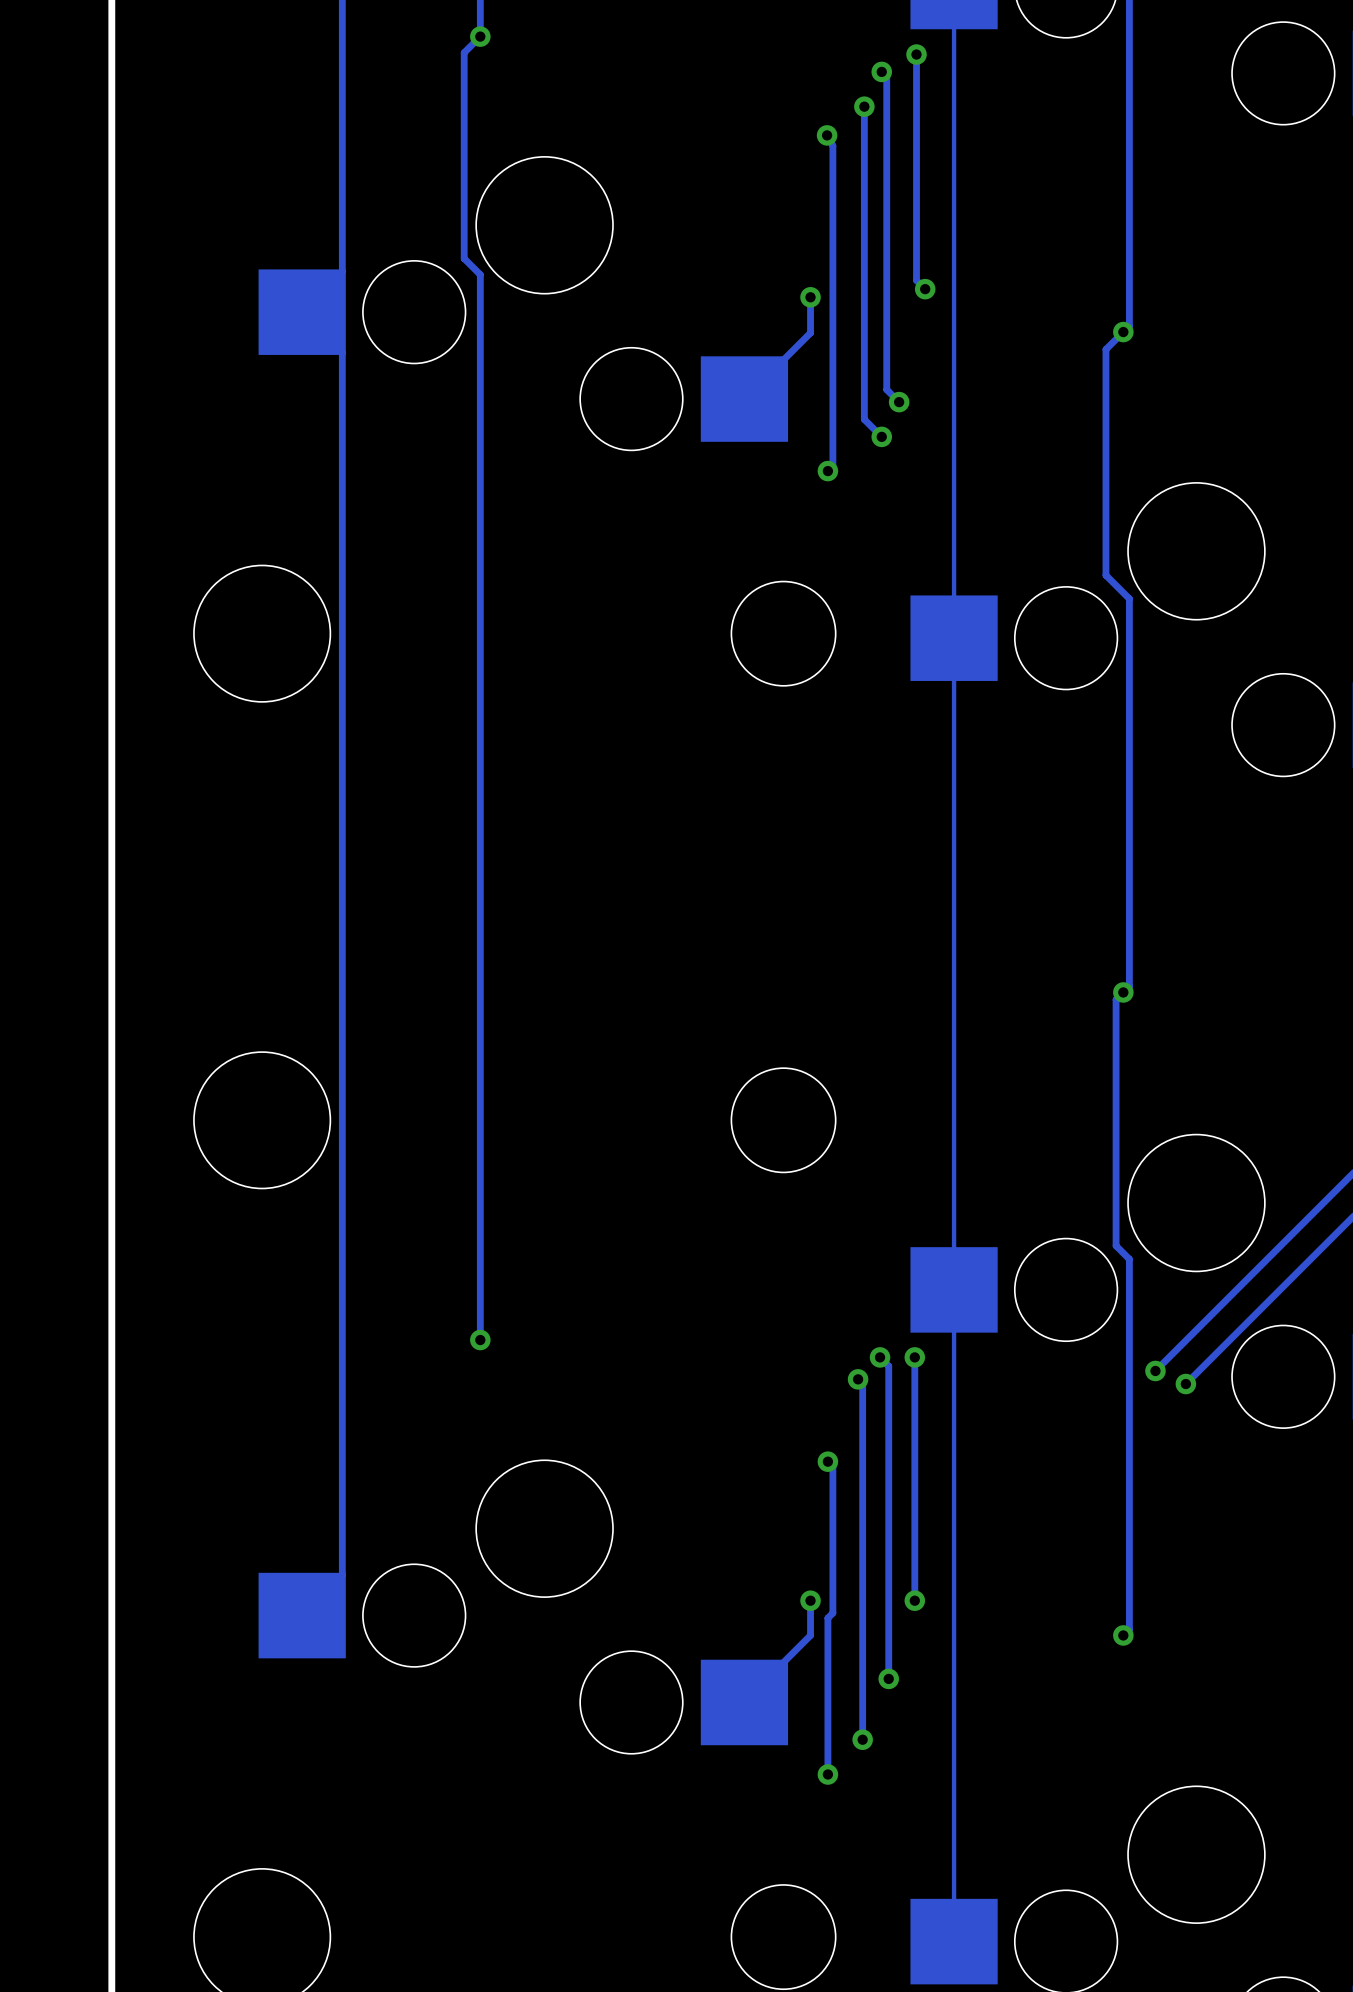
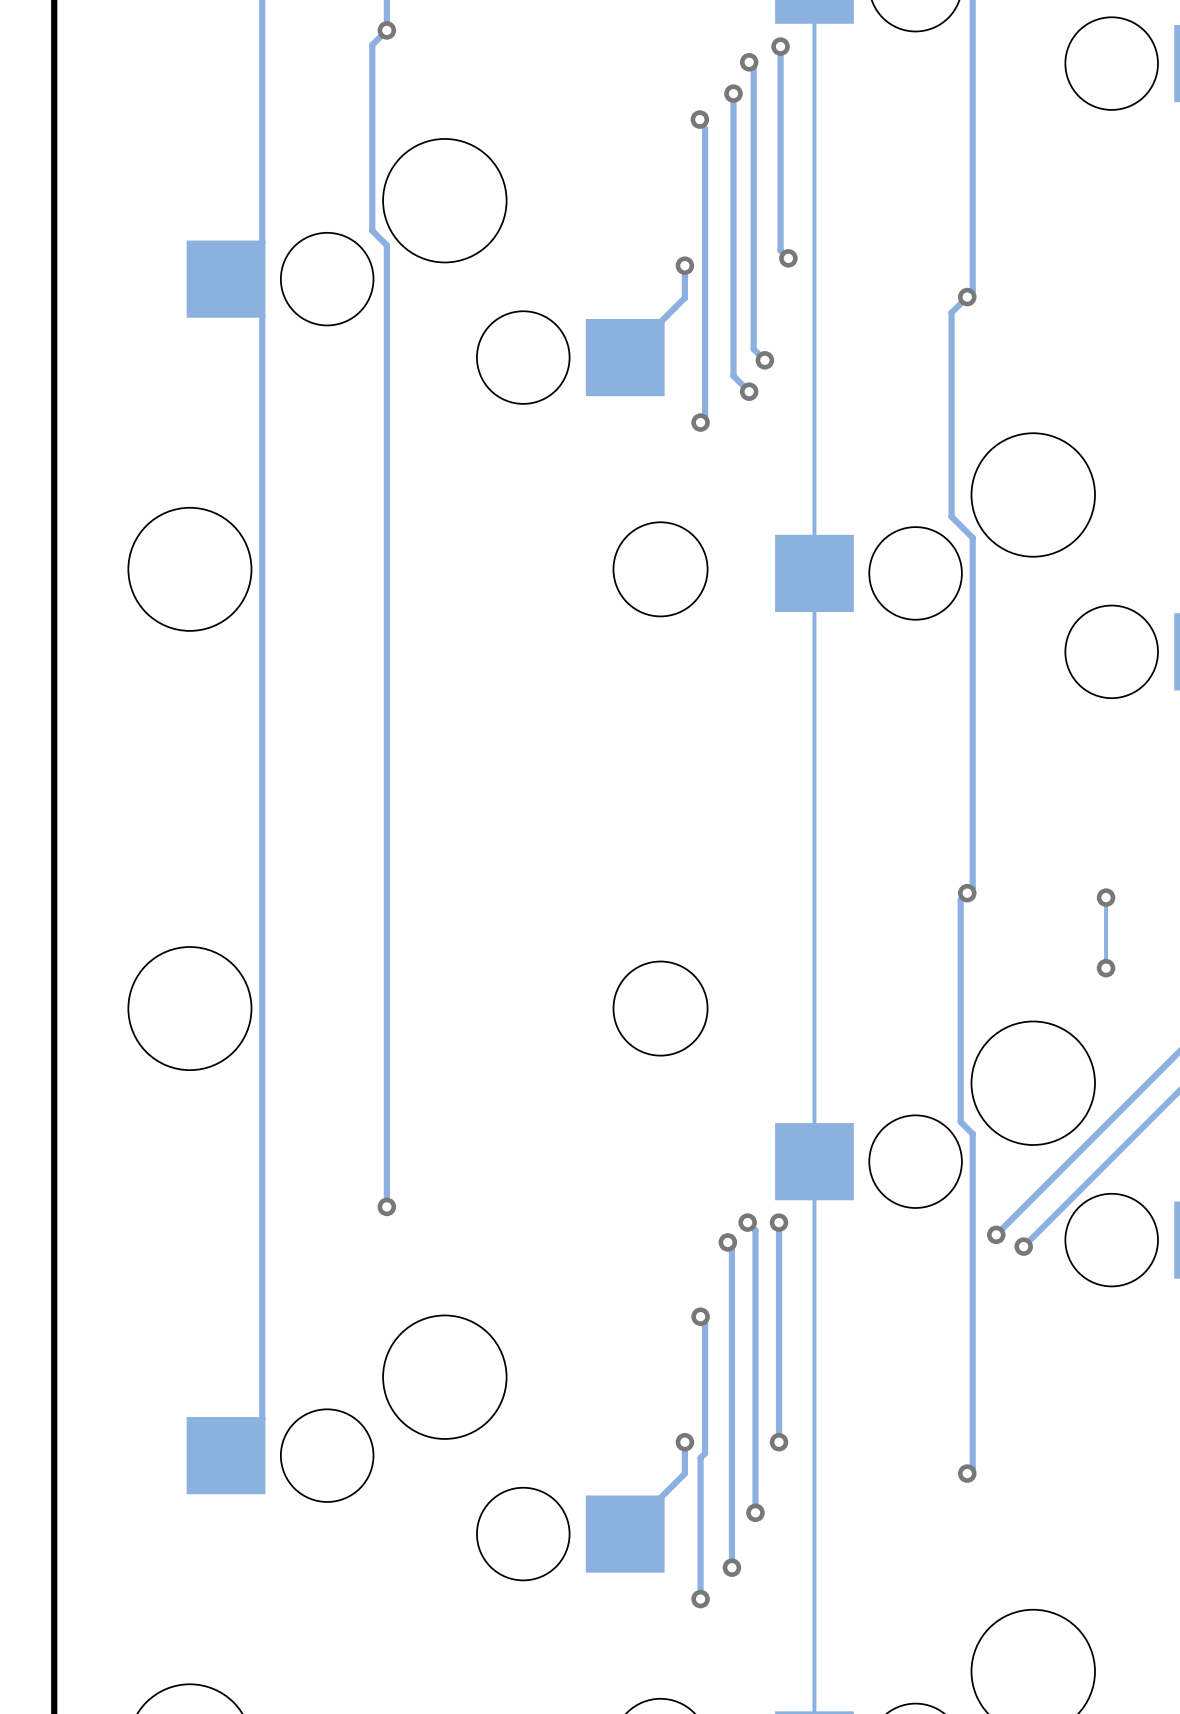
track: none -> (1106, 897) (1106, 968)
via: none -> (1106, 897)
via: none -> (1106, 968)

